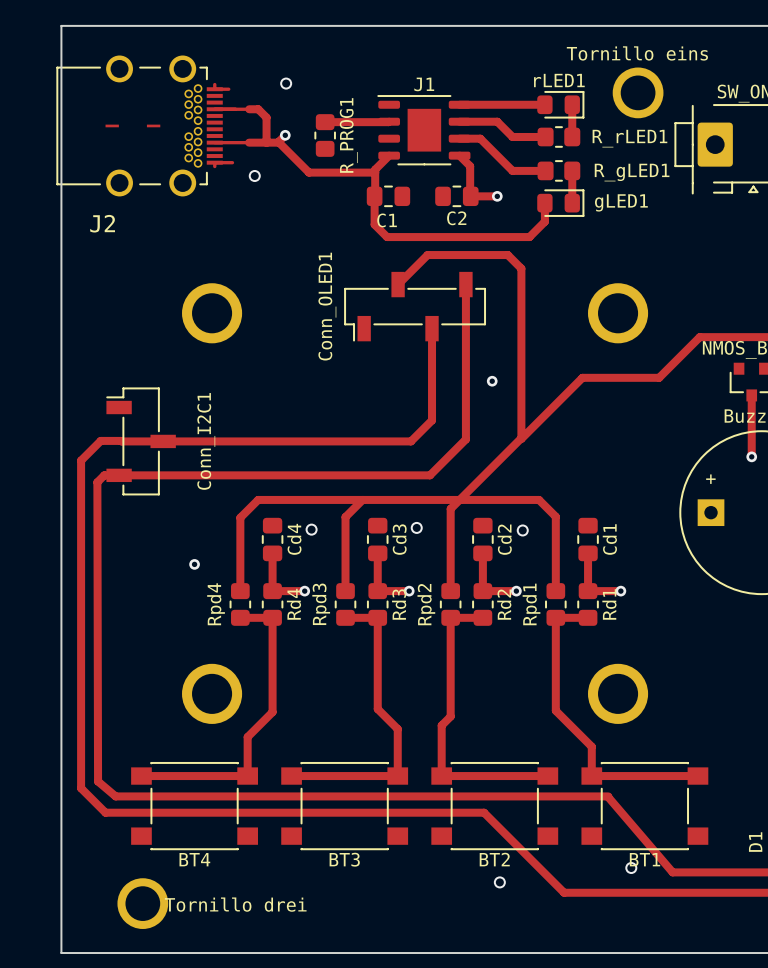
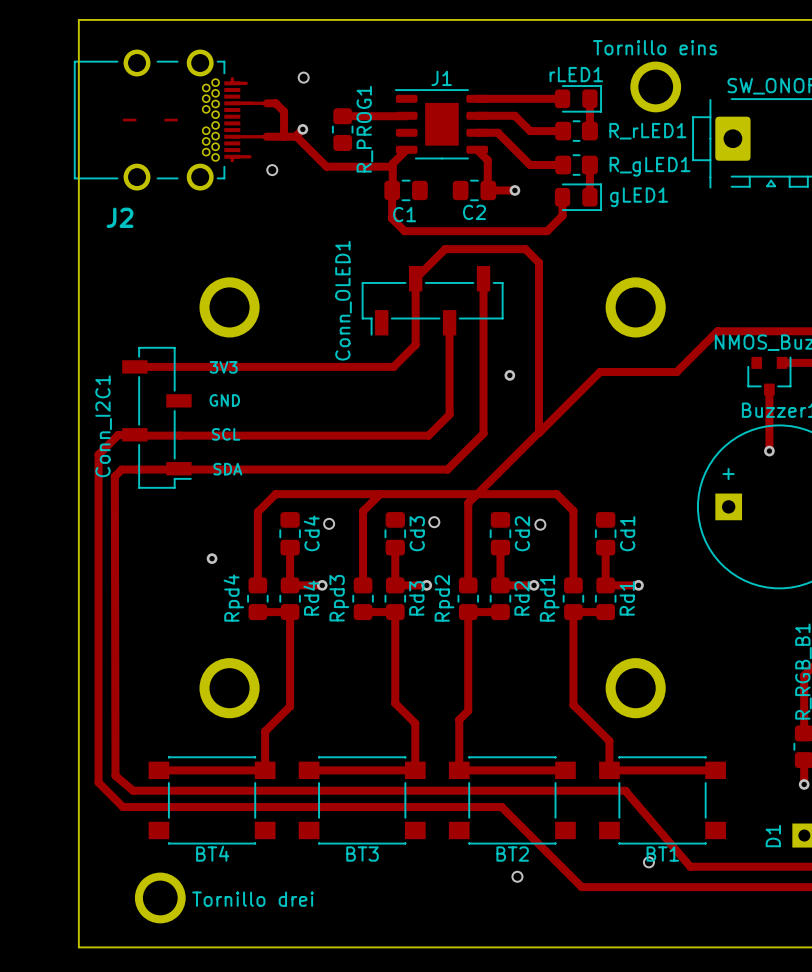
track: none -> (415, 278) (415, 344) (393, 366) (134, 366)
text: none -> 3V3 (223, 367)
Conn_I2C1 footprint: [106, 387, 176, 496] -> [122, 347, 192, 489]
text: none -> GND (224, 400)
text: none -> SCL (226, 434)
Conn_I2C1 name position: Conn_I2C1 (206, 441) -> Conn_I2C1 (103, 426)
text: none -> SDA (227, 469)

